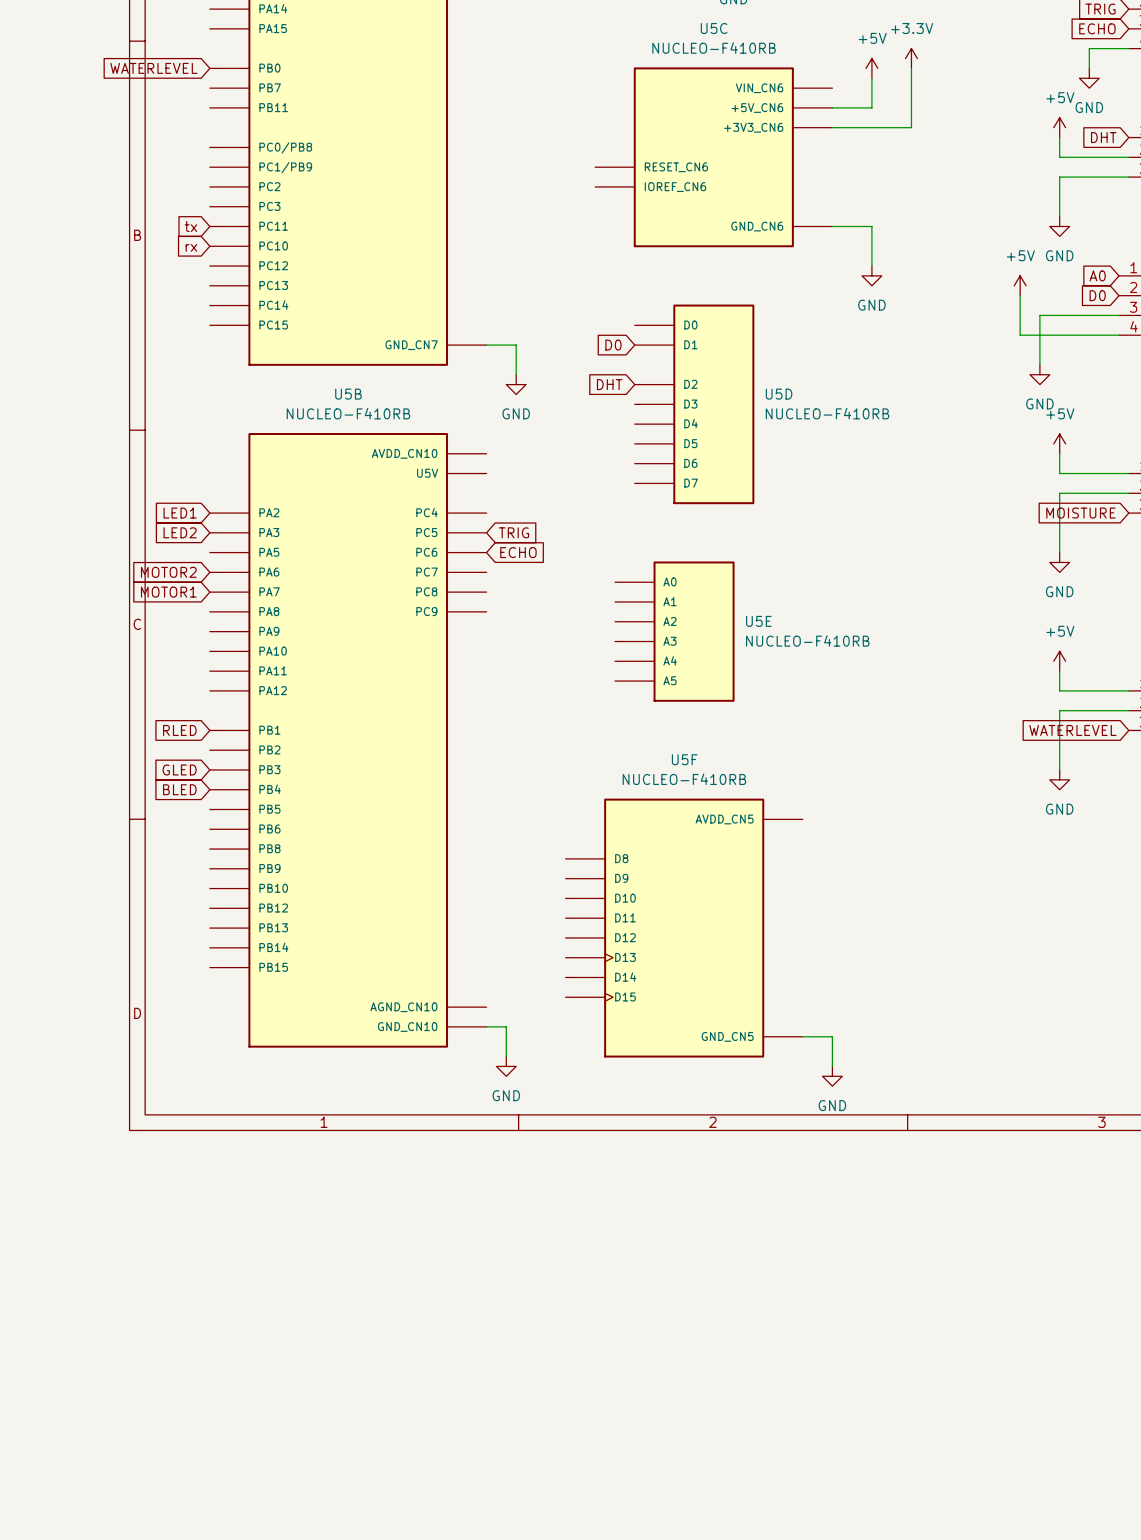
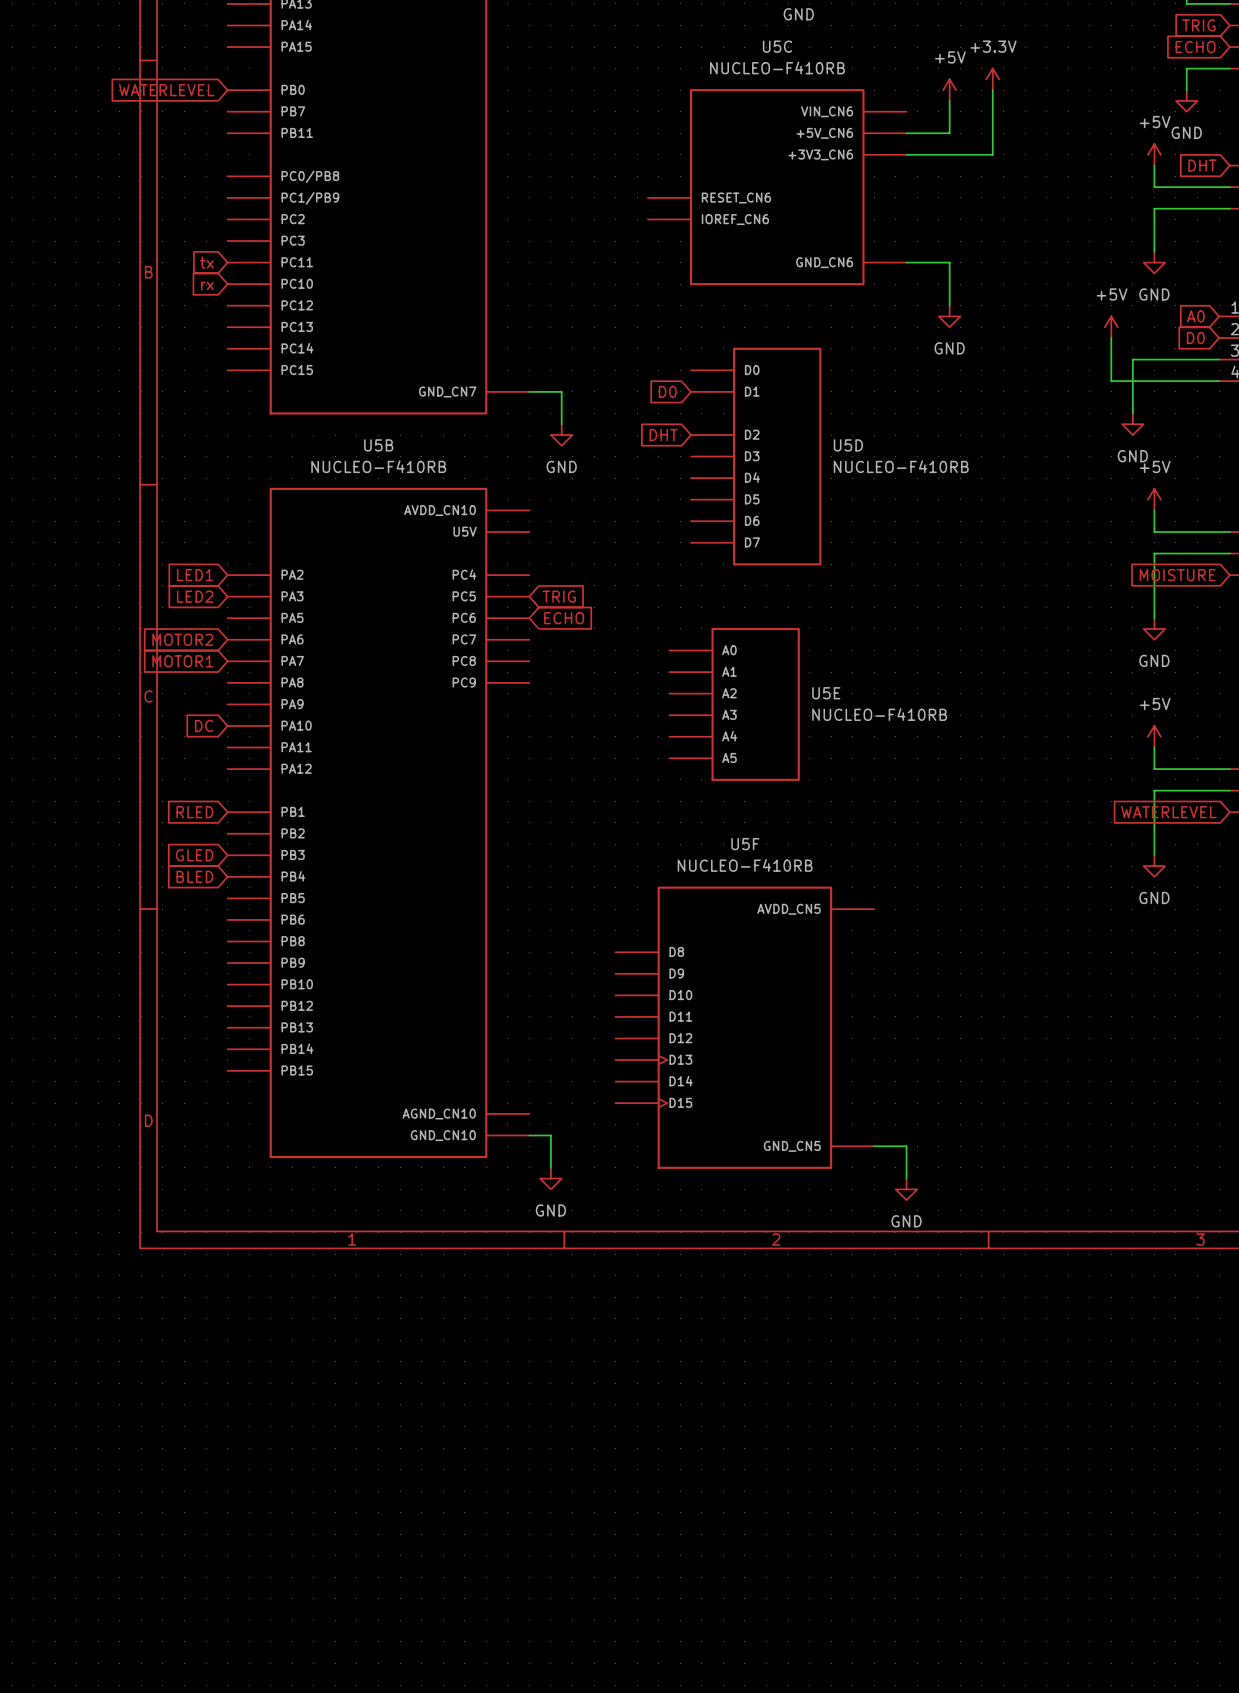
global label: none -> DC (204, 725)

